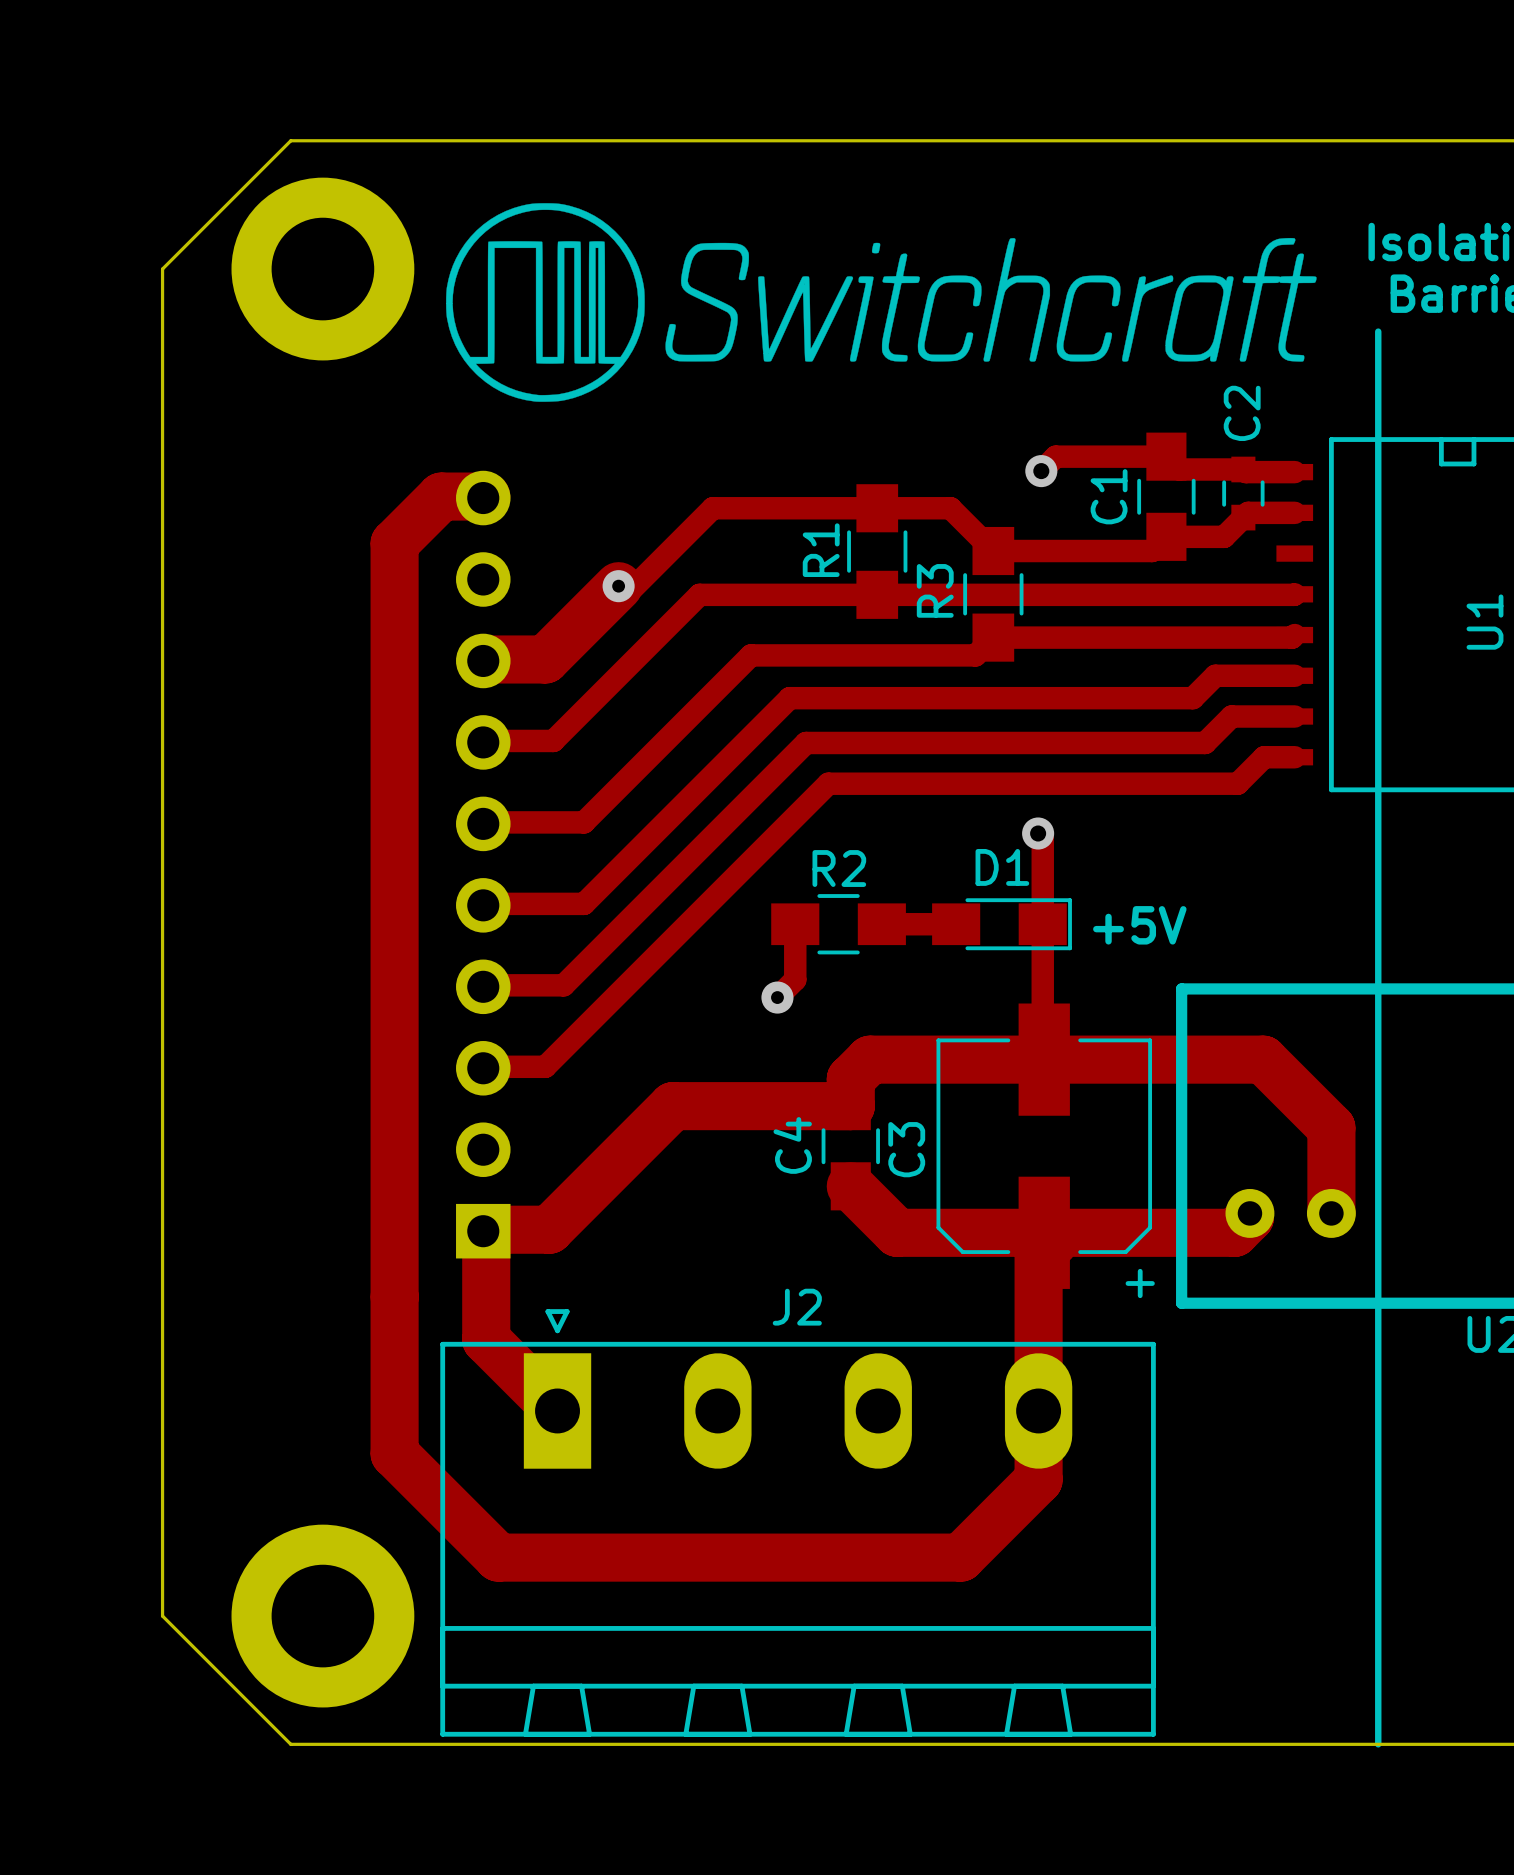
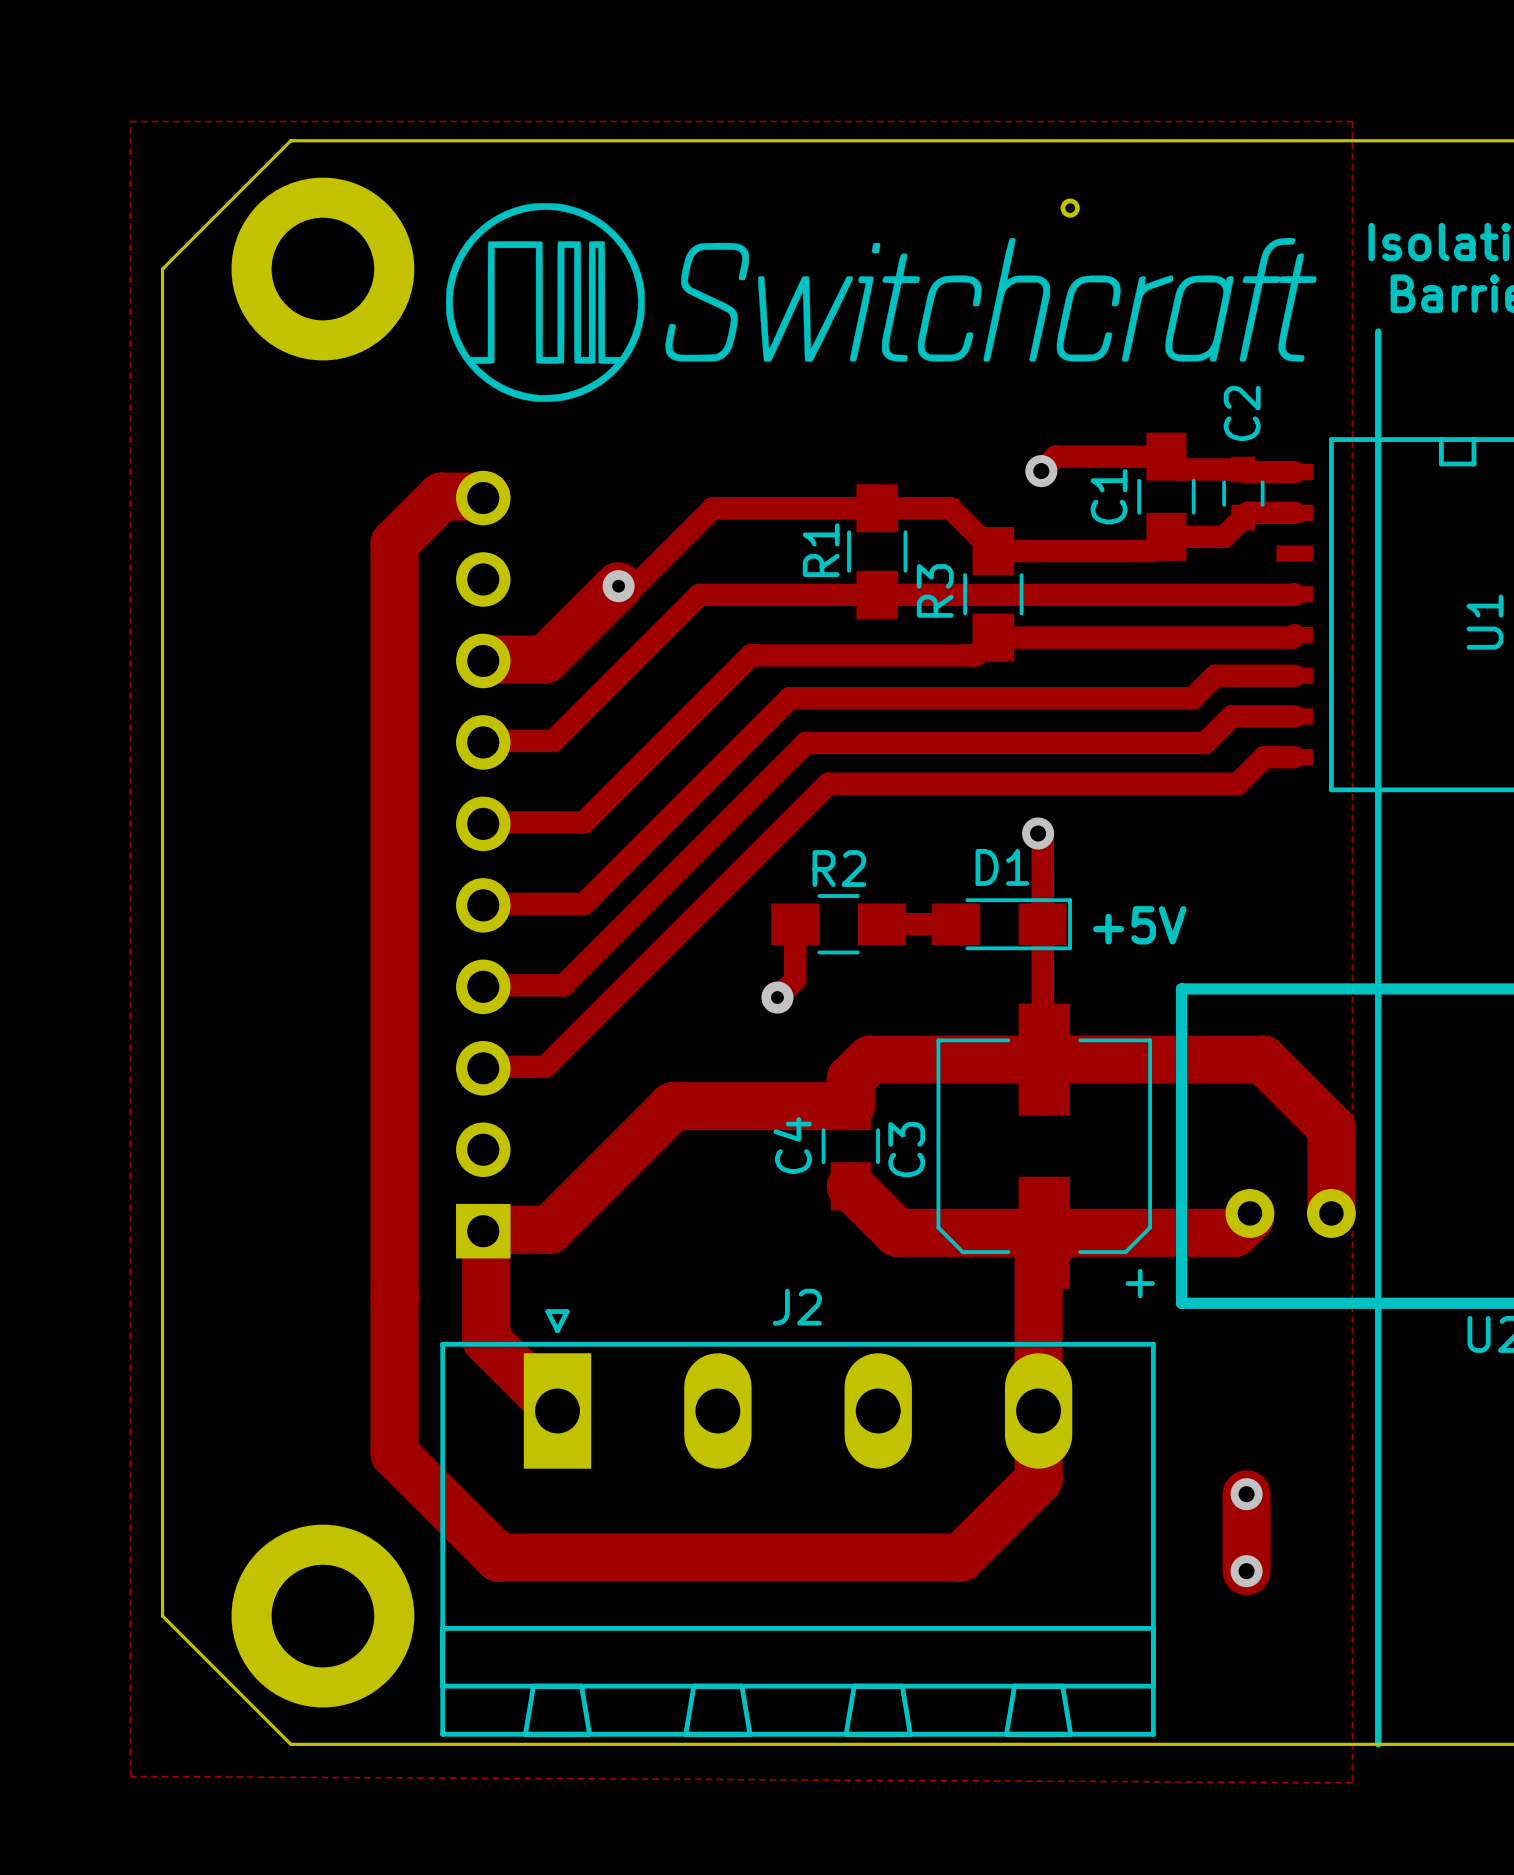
zone outline: none -> (130, 121) (1352, 121) (1352, 1782) (130, 1776) (130, 121)
part: none -> (1070, 208)
track: none -> (1246, 1494) (1246, 1571)
via: none -> (1246, 1494)
via: none -> (1246, 1571)

